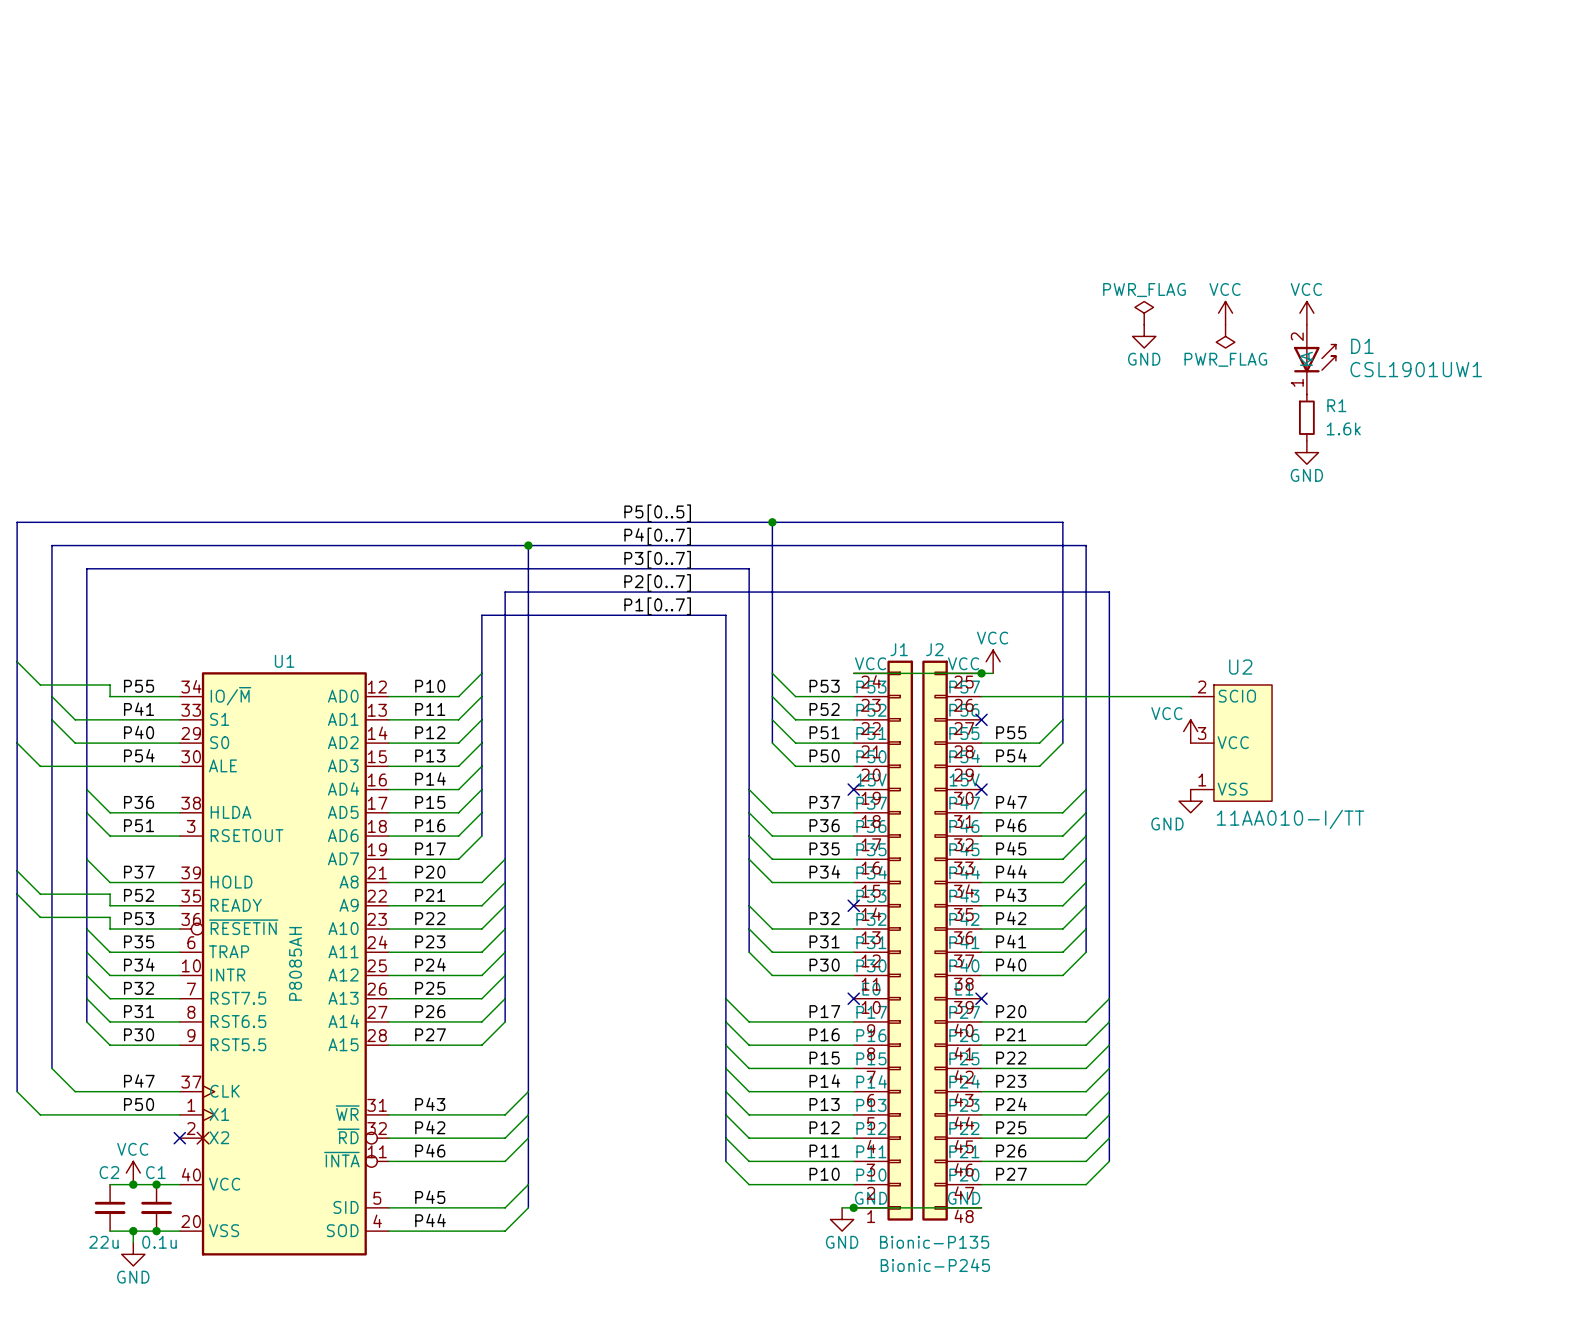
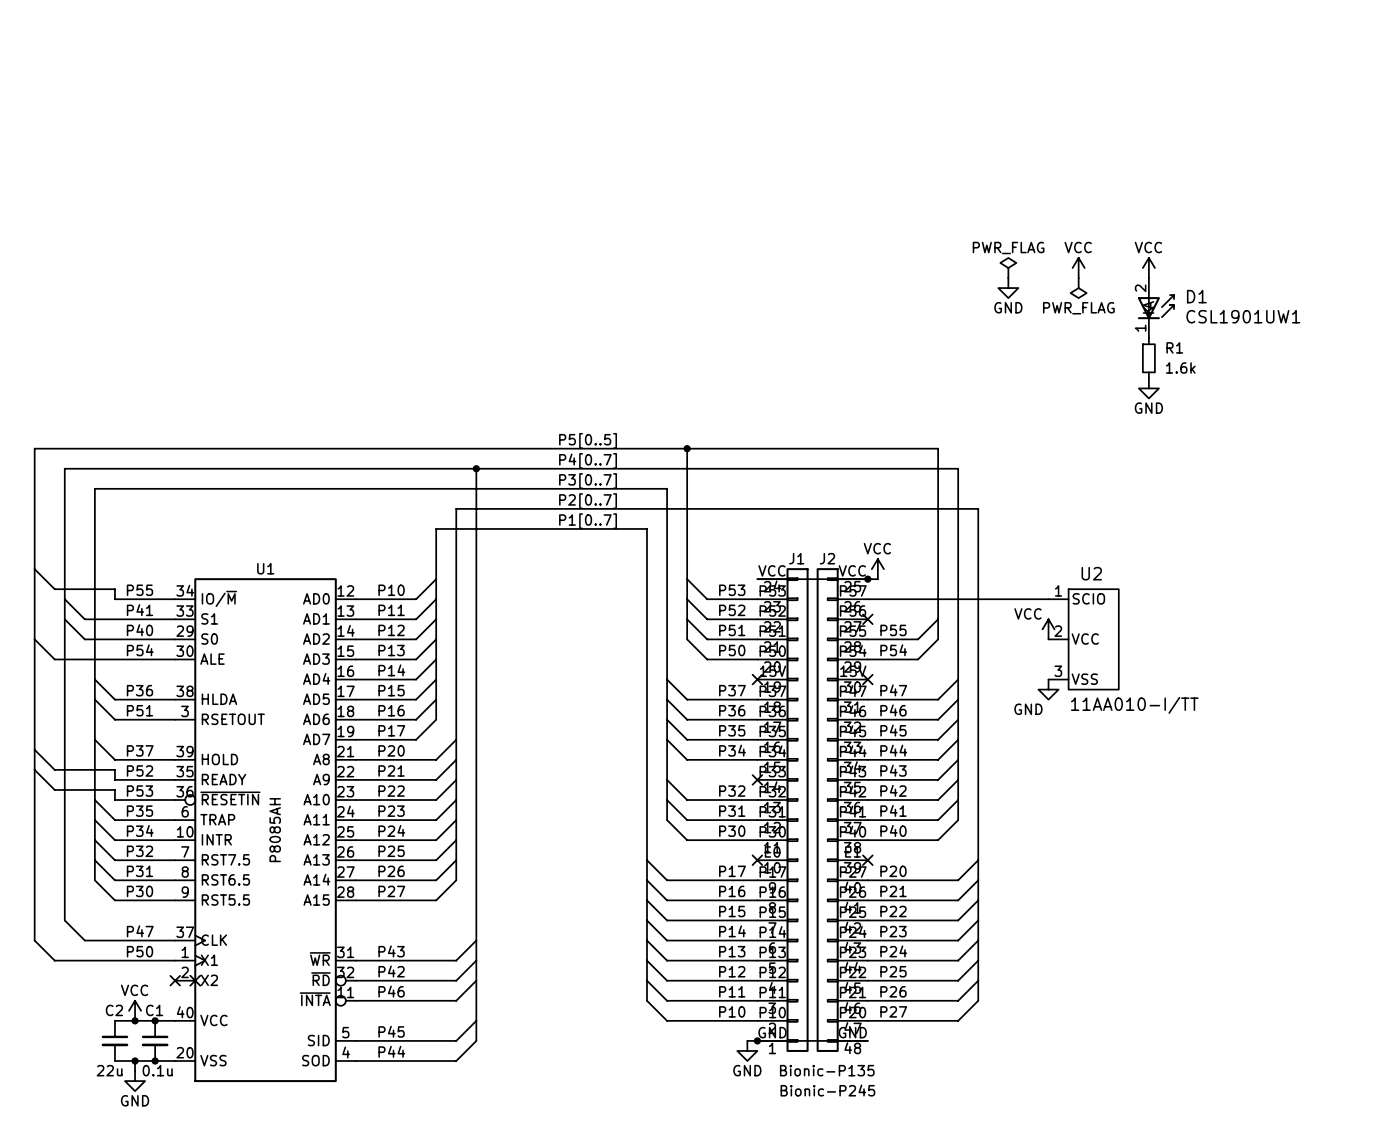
U2 pin number: 2 (1202, 687) -> 1 (1058, 590)
U2 pin number: 3 (1202, 733) -> 2 (1058, 631)
U2 pin number: 1 (1202, 779) -> 3 (1058, 671)

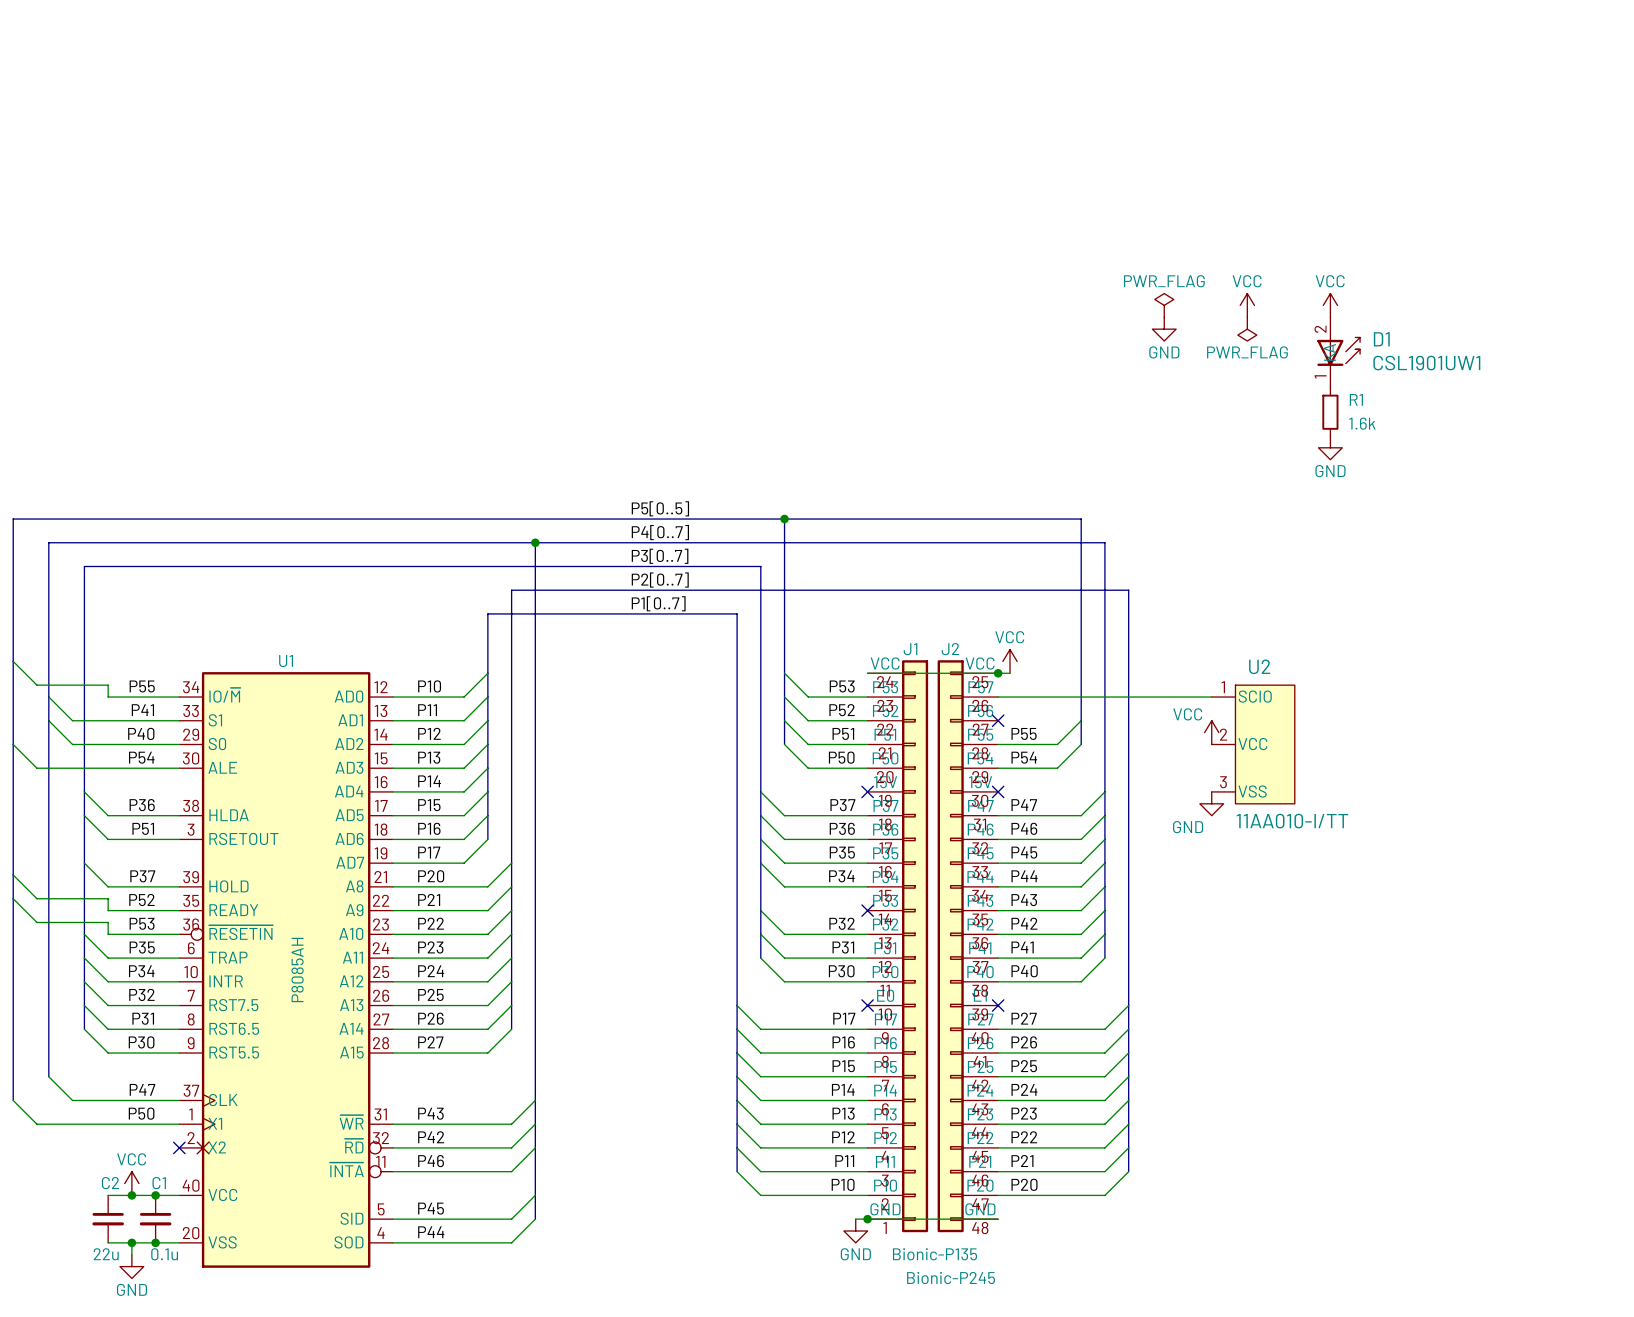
label: P20 (893, 871) -> P27 (1024, 1018)
label: P21 (893, 891) -> P26 (1024, 1042)
label: P22 (893, 911) -> P25 (1024, 1066)
label: P23 (893, 931) -> P24 (1024, 1089)
label: P24 (893, 951) -> P23 (1024, 1113)
label: P25 (893, 971) -> P22 (1024, 1137)
label: P26 (893, 991) -> P21 (1022, 1161)
label: P27 (893, 1011) -> P20 (1024, 1184)

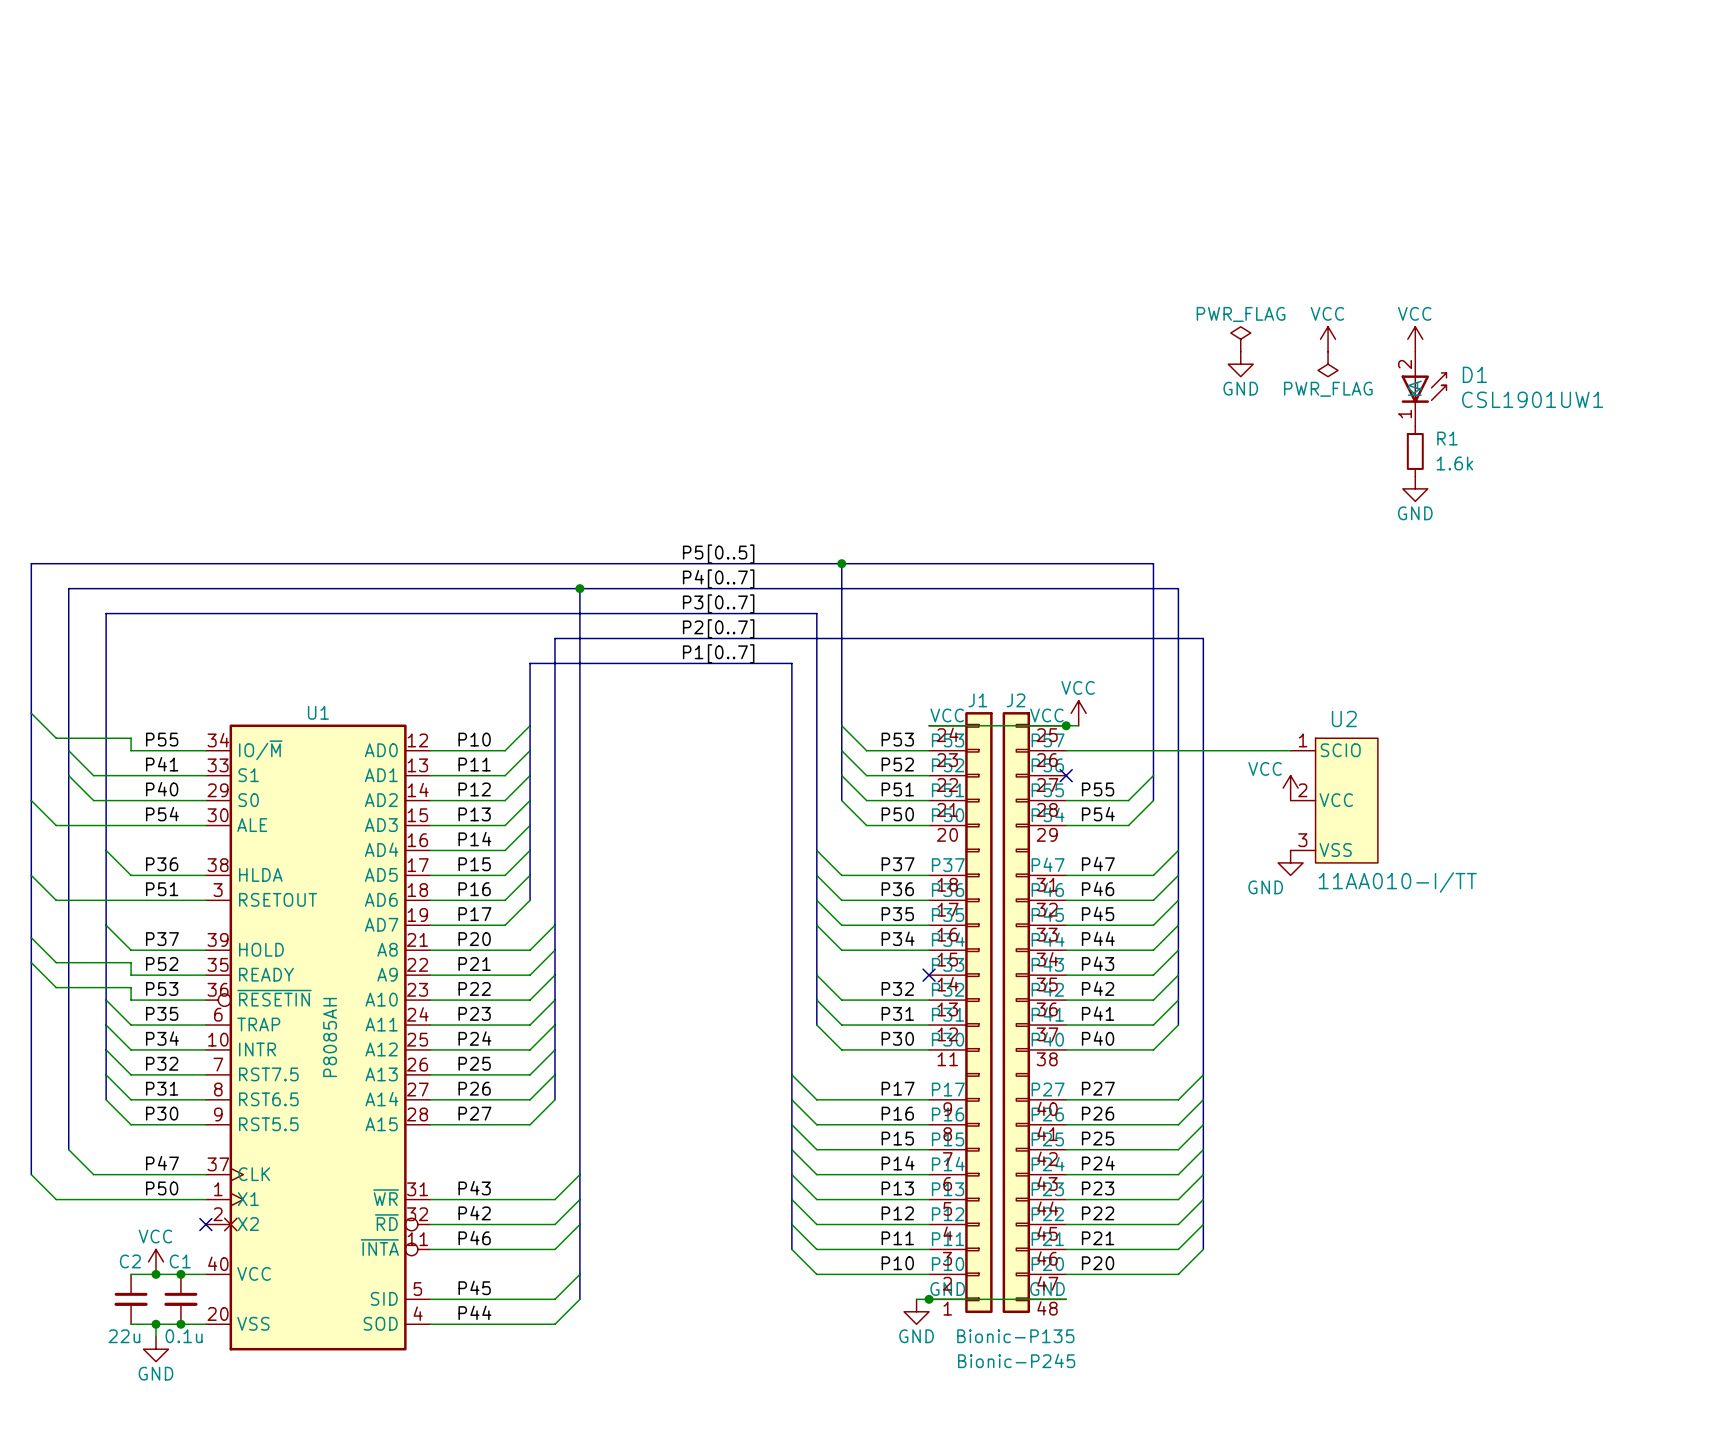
J1 symbol: [867, 660, 929, 1233] -> [929, 712, 993, 1314]
J2 symbol: [937, 660, 999, 1233] -> [1002, 712, 1067, 1314]
no-connect mark: (867, 791) -> none
no-connect mark: (998, 791) -> none
wire: (84, 815) (108, 839) -> (31, 875) (56, 900) (131, 900)
no-connect mark: (867, 1005) -> none
no-connect mark: (998, 1005) -> none

